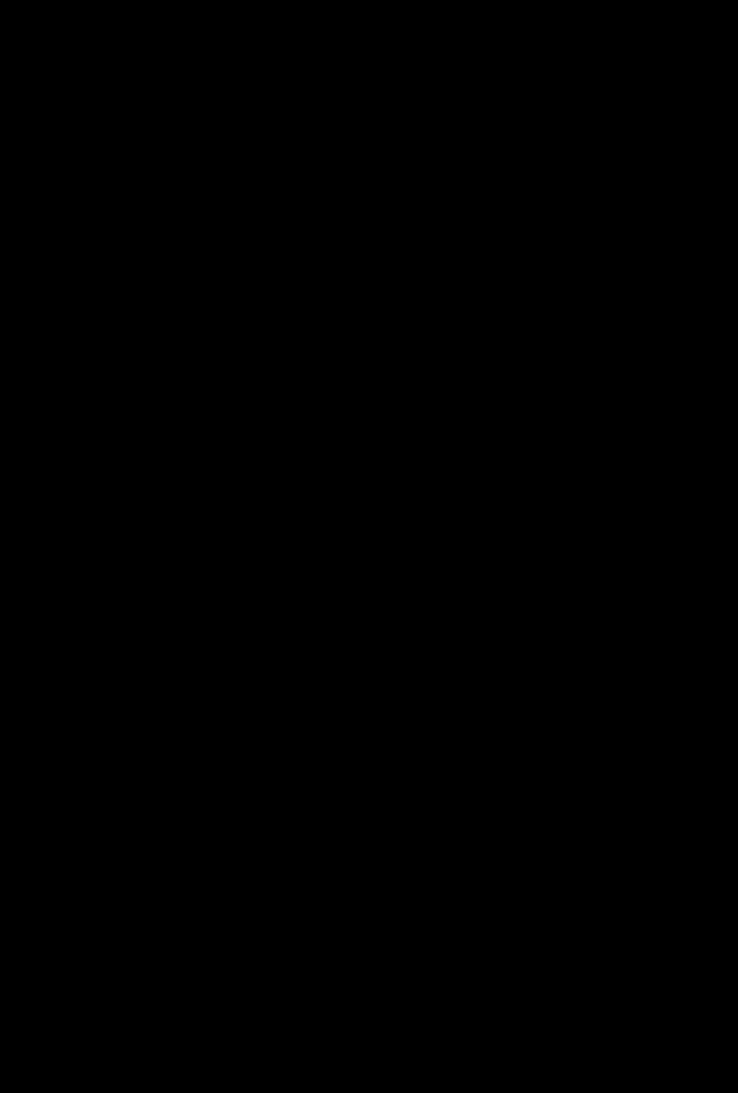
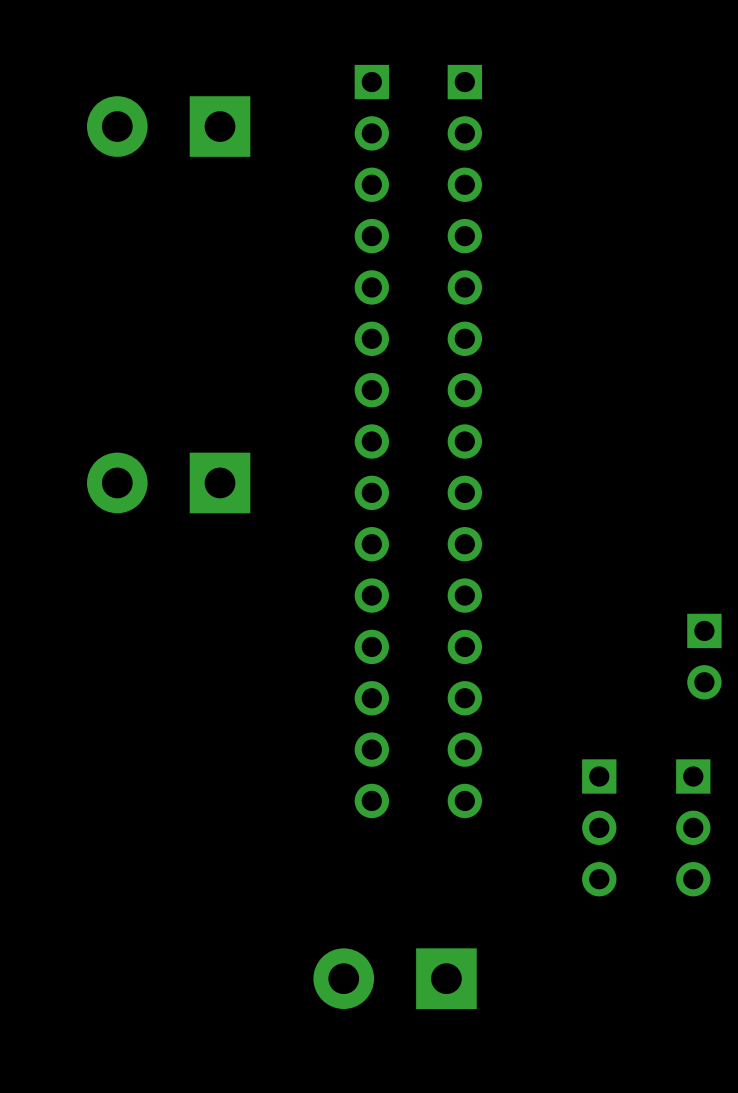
part: none -> (168, 126)
part: none -> (371, 441)
part: none -> (464, 441)
part: none -> (168, 482)
part: none -> (704, 656)
part: none -> (599, 827)
part: none -> (693, 827)
part: none -> (395, 978)

